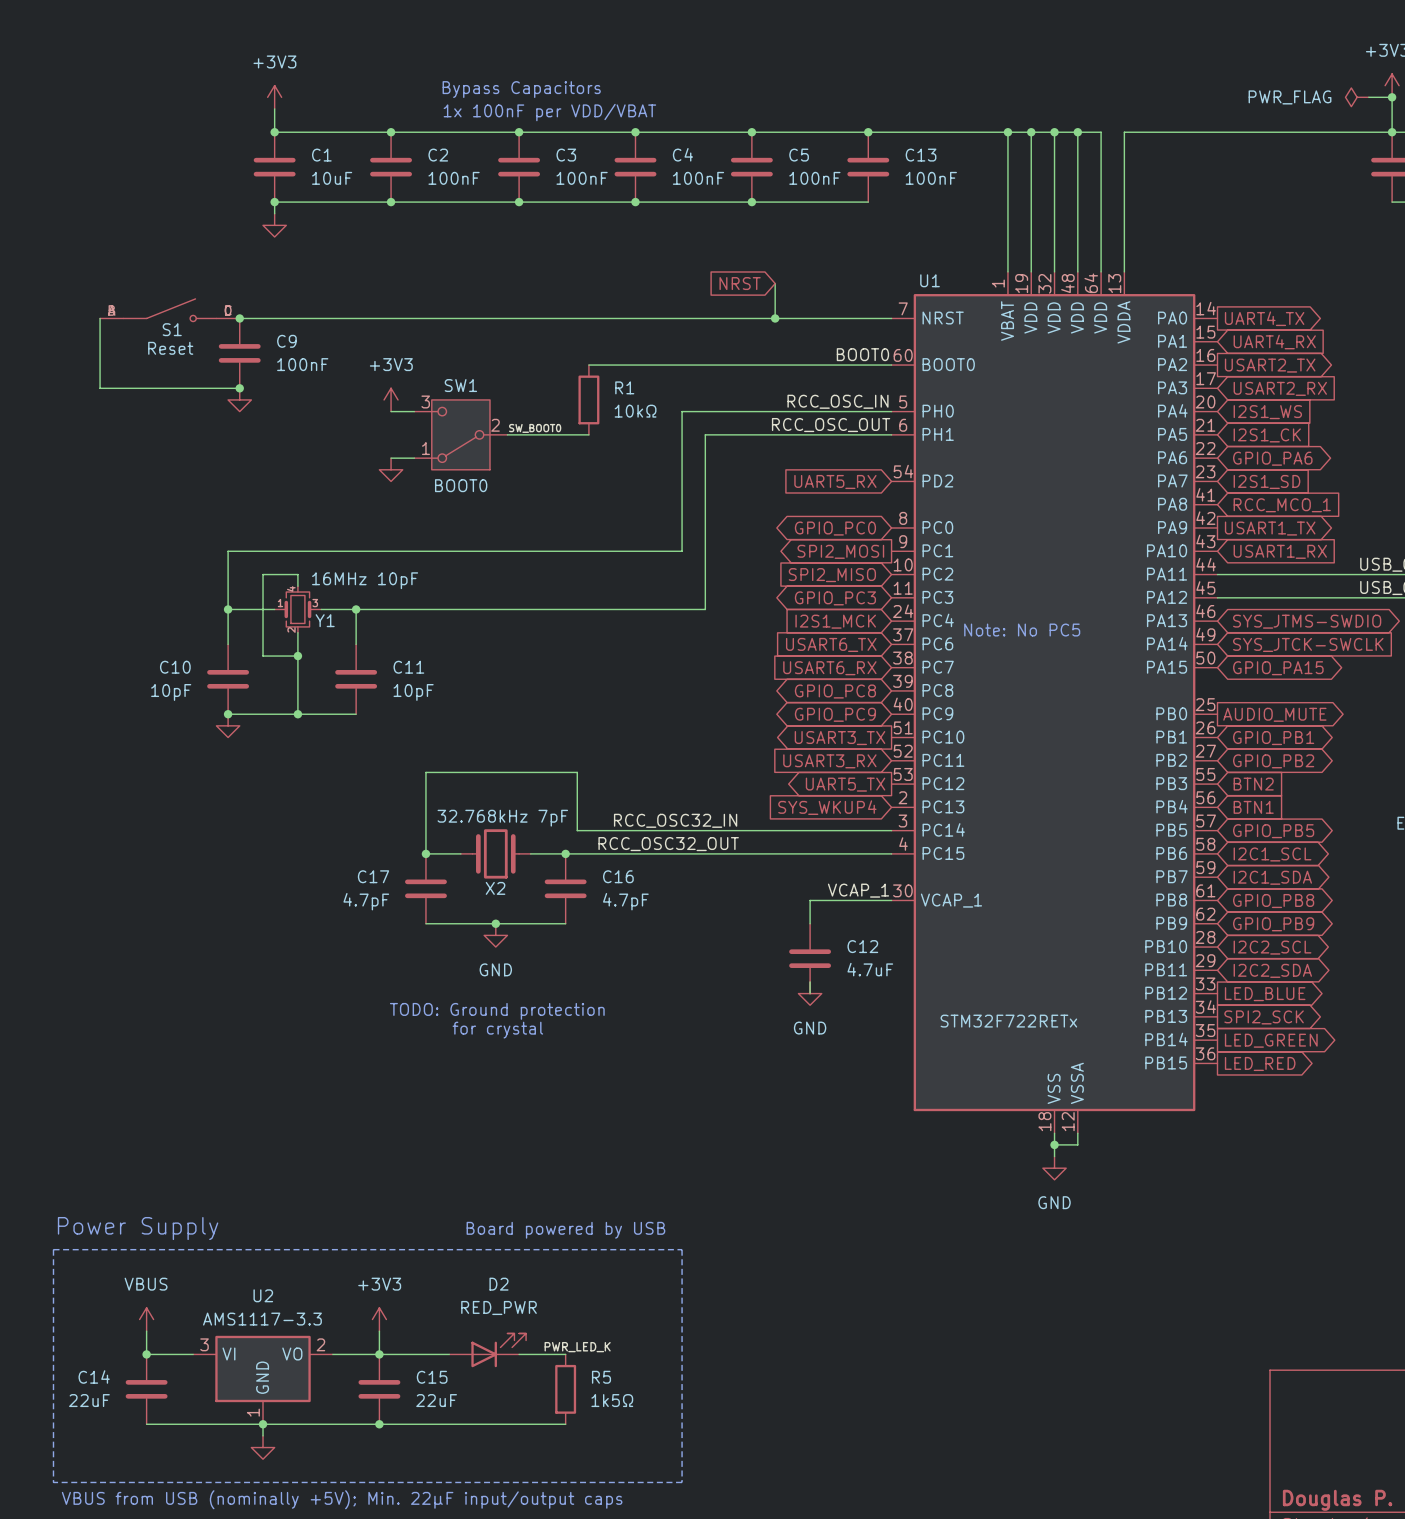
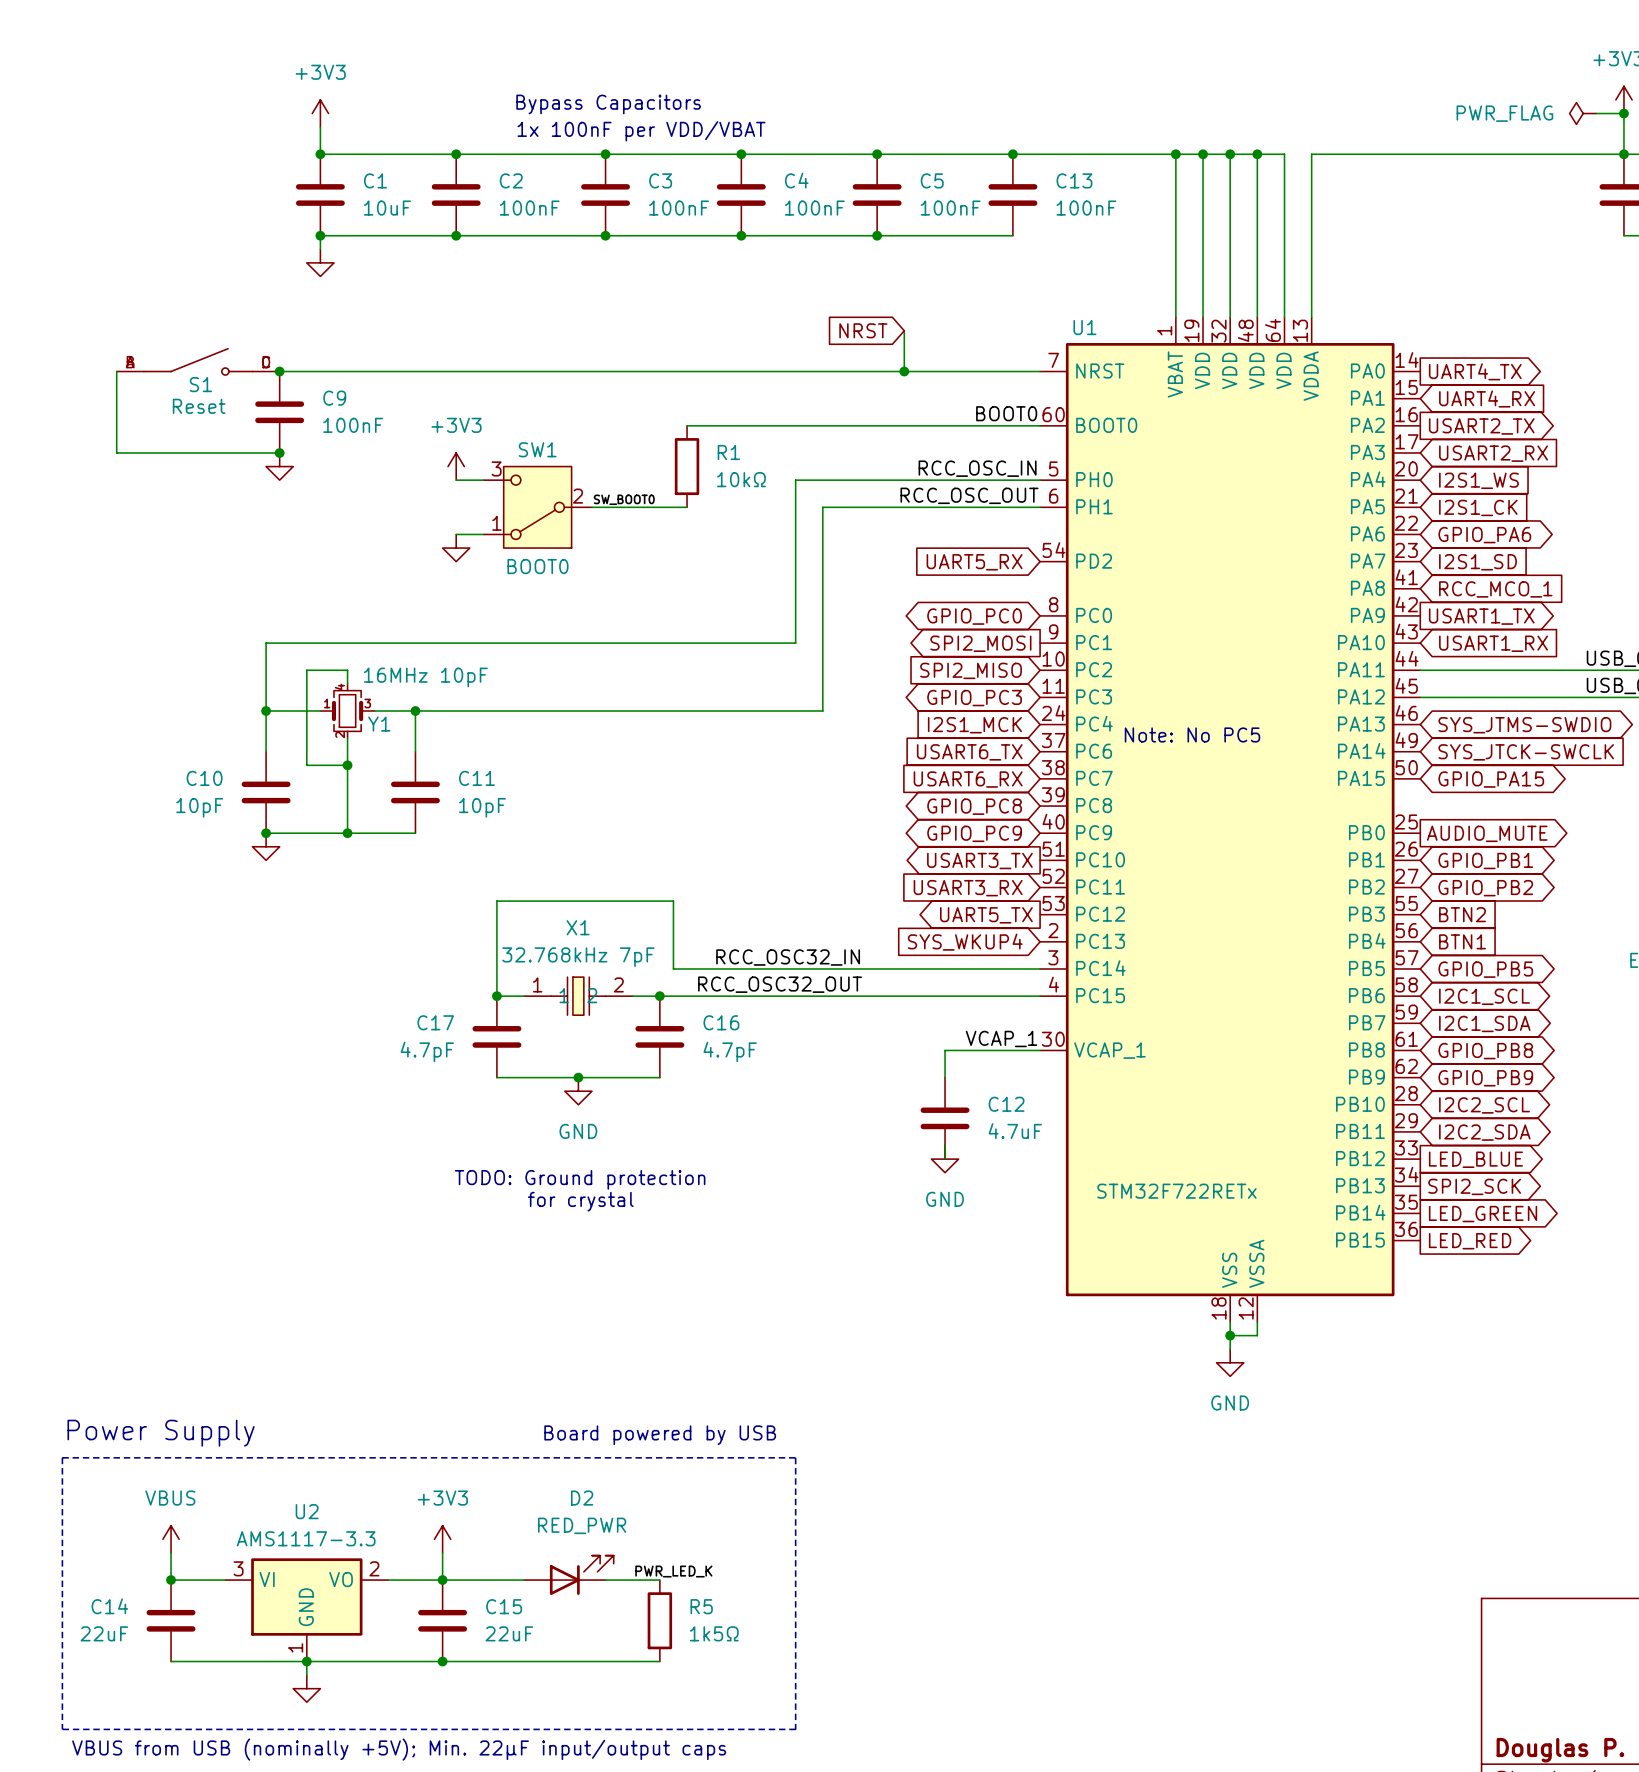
X2: 32.768kHz 7pF (495, 853) -> none
X1: none -> 32.768kHz 7pF (578, 996)

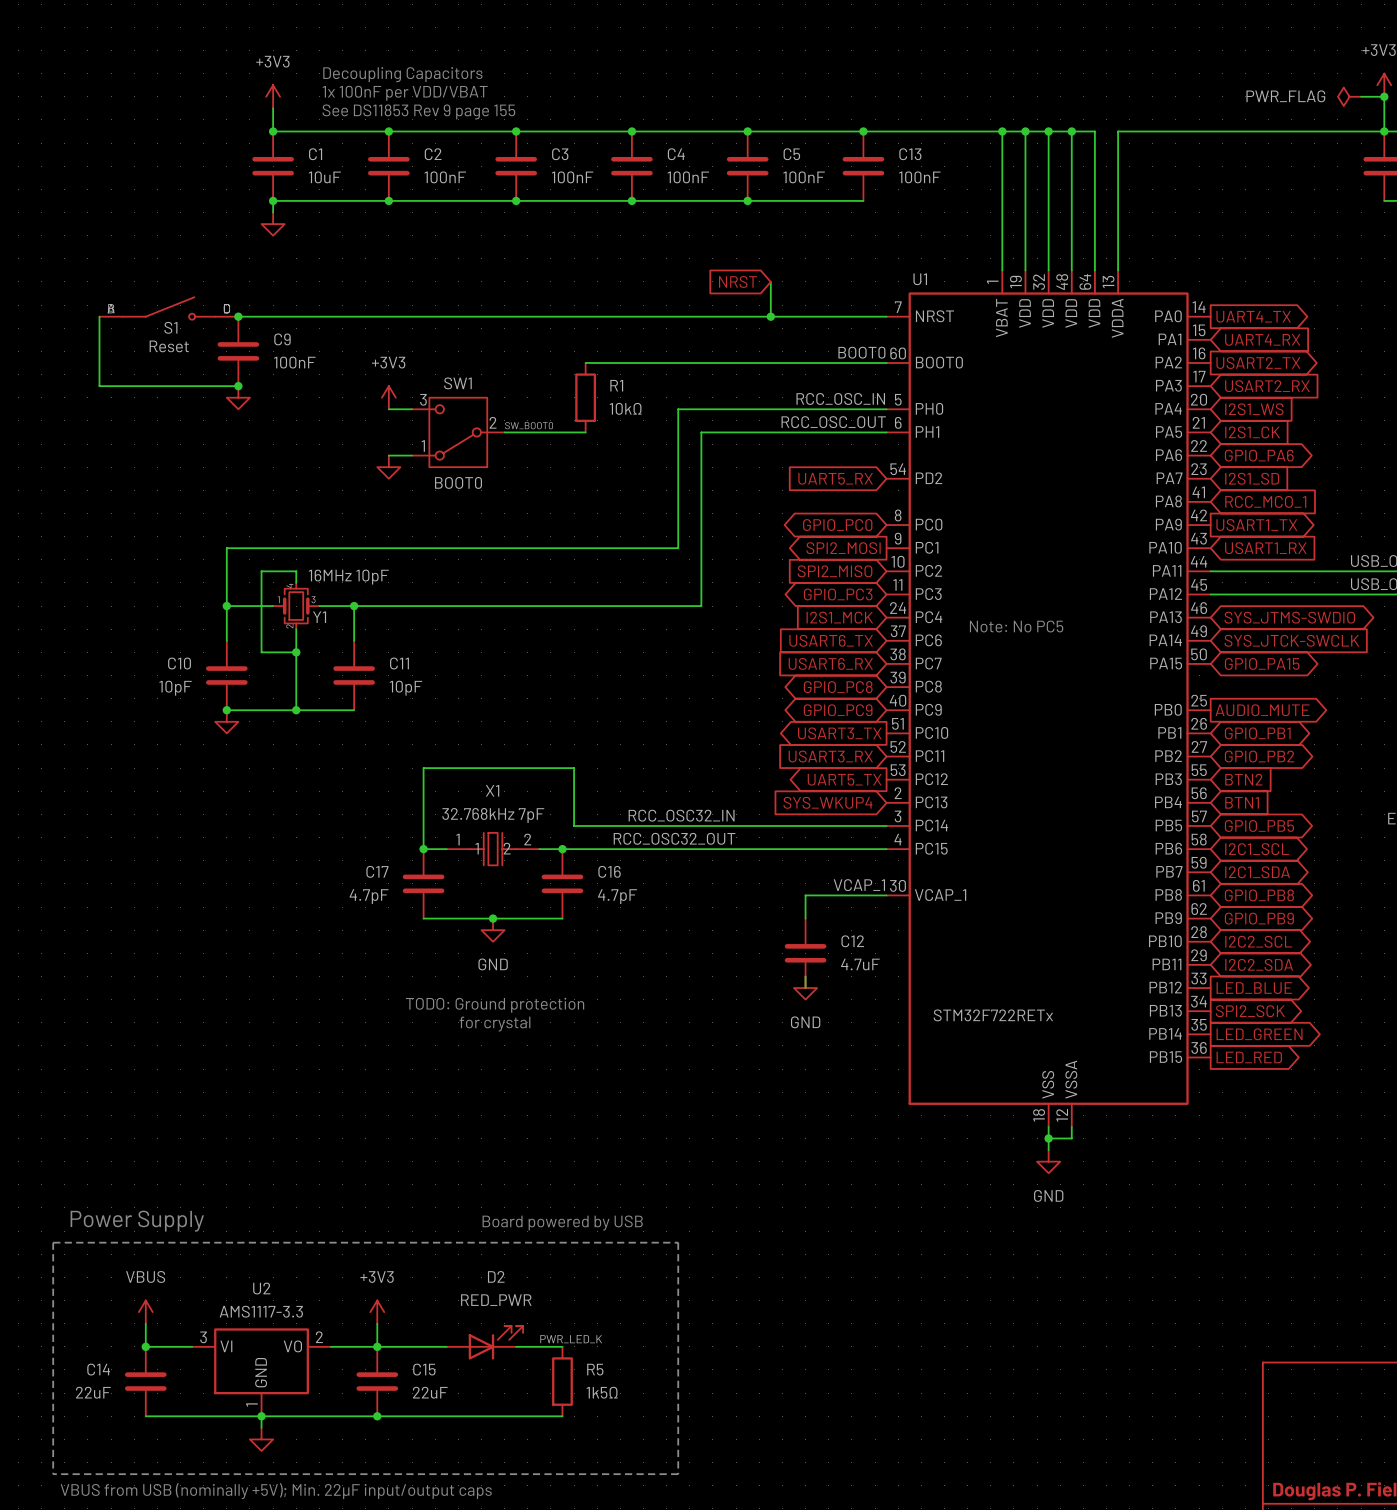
text: Bypass Capacitors (608, 104) -> Decoupling Capacitors (402, 74)
text: none -> See DS11853 Rev 9 page 155 (418, 111)
text position: 1x 100nF per VDD/VBAT (641, 131) -> 1x 100nF per VDD/VBAT (405, 93)

